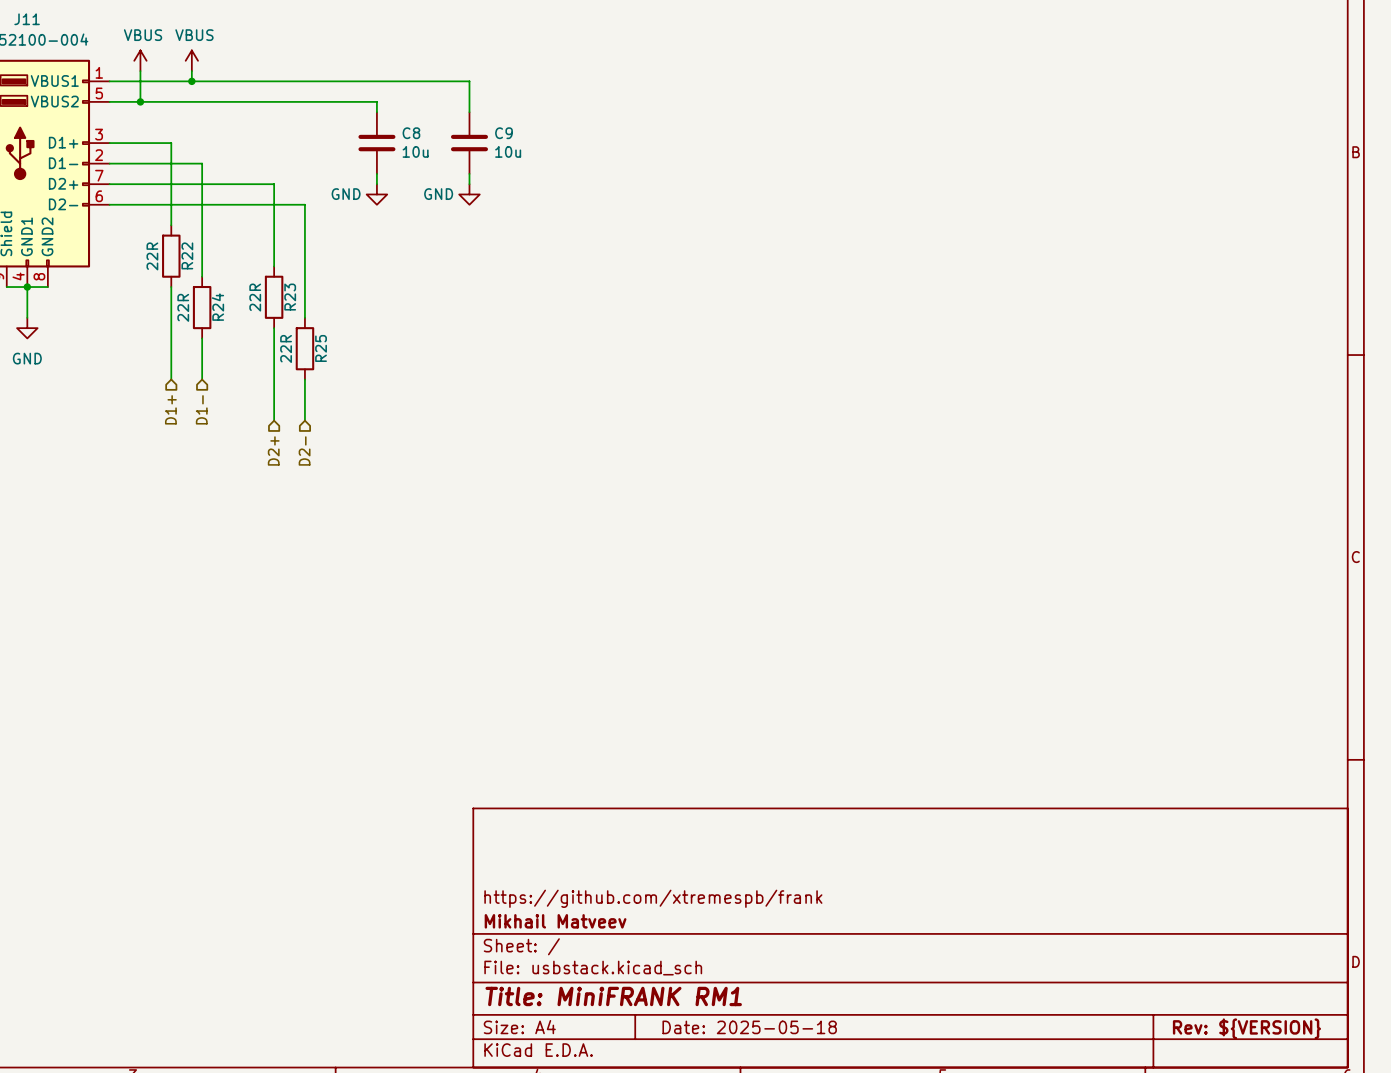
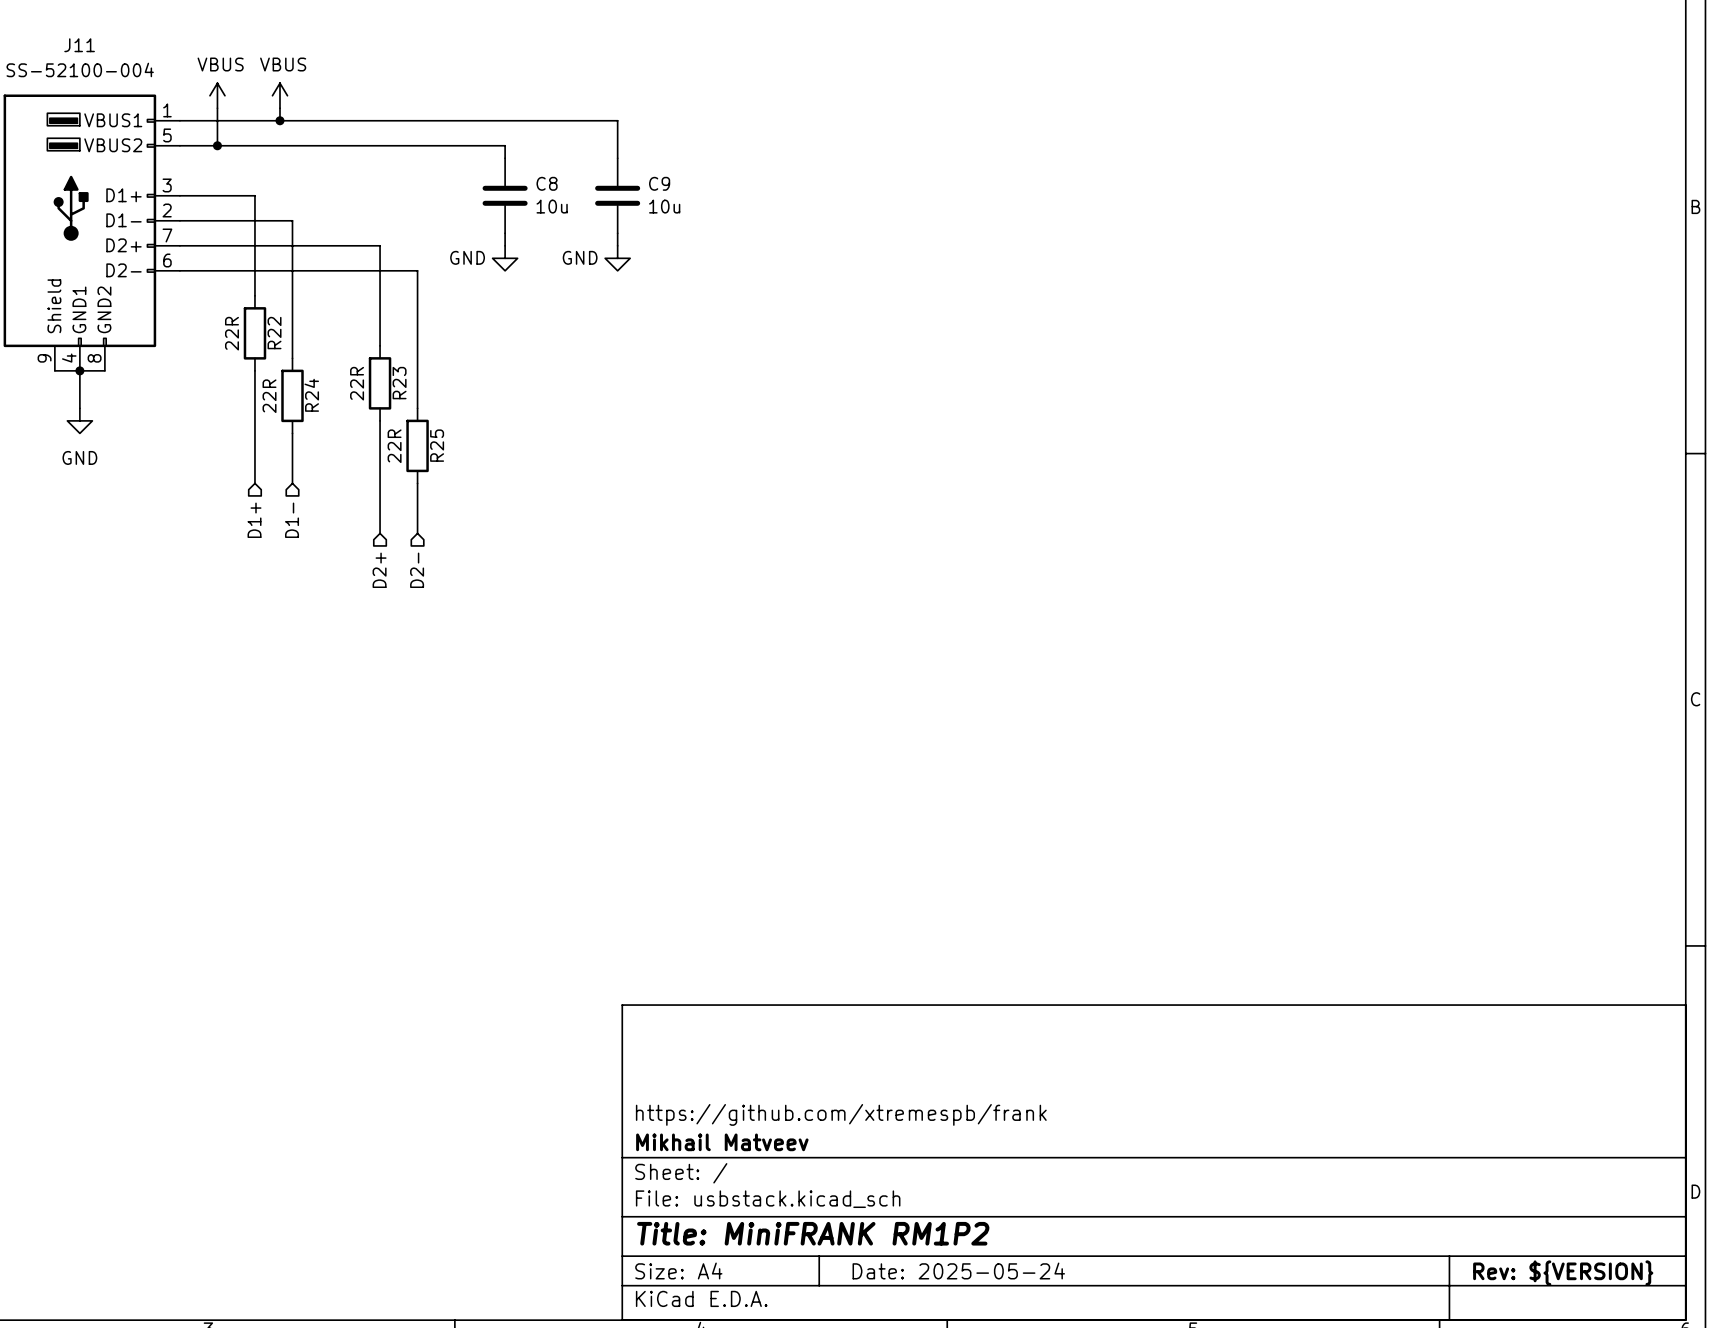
title block: Title: MiniFRANK RM1 (613, 996) -> Title: MiniFRANK RM1P2 (813, 1233)
title block: Date: 2025-05-18 (749, 1027) -> Date: 2025-05-24 (958, 1270)

